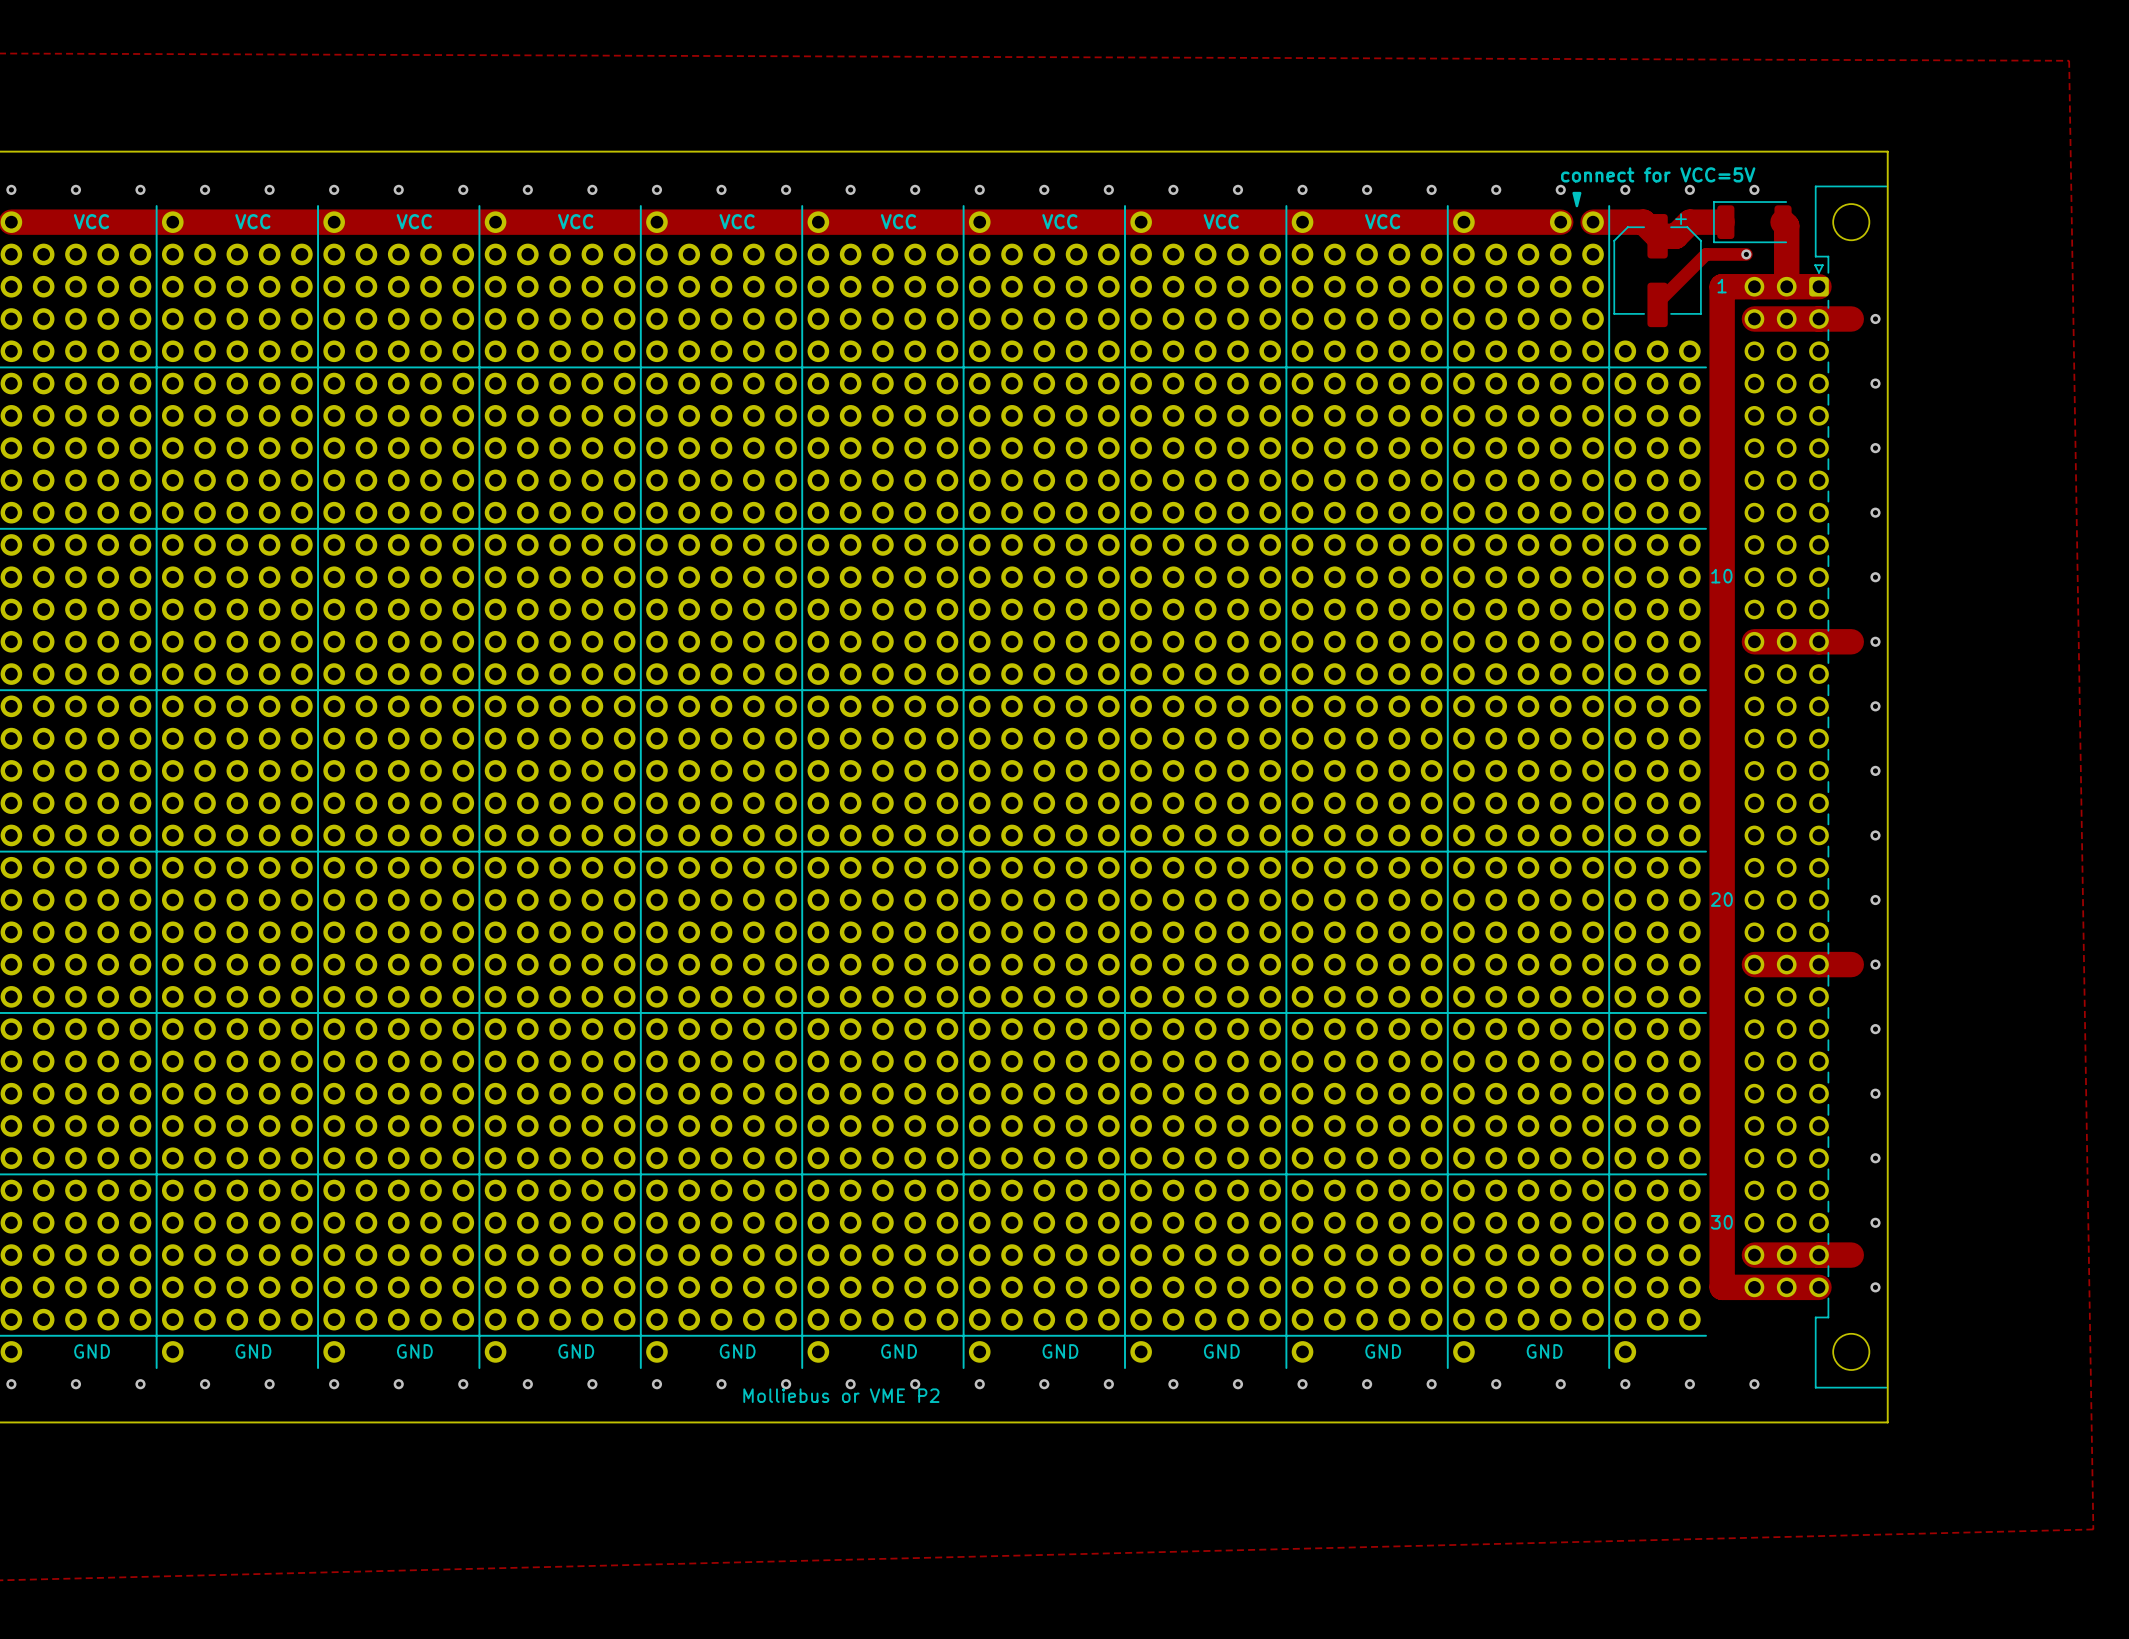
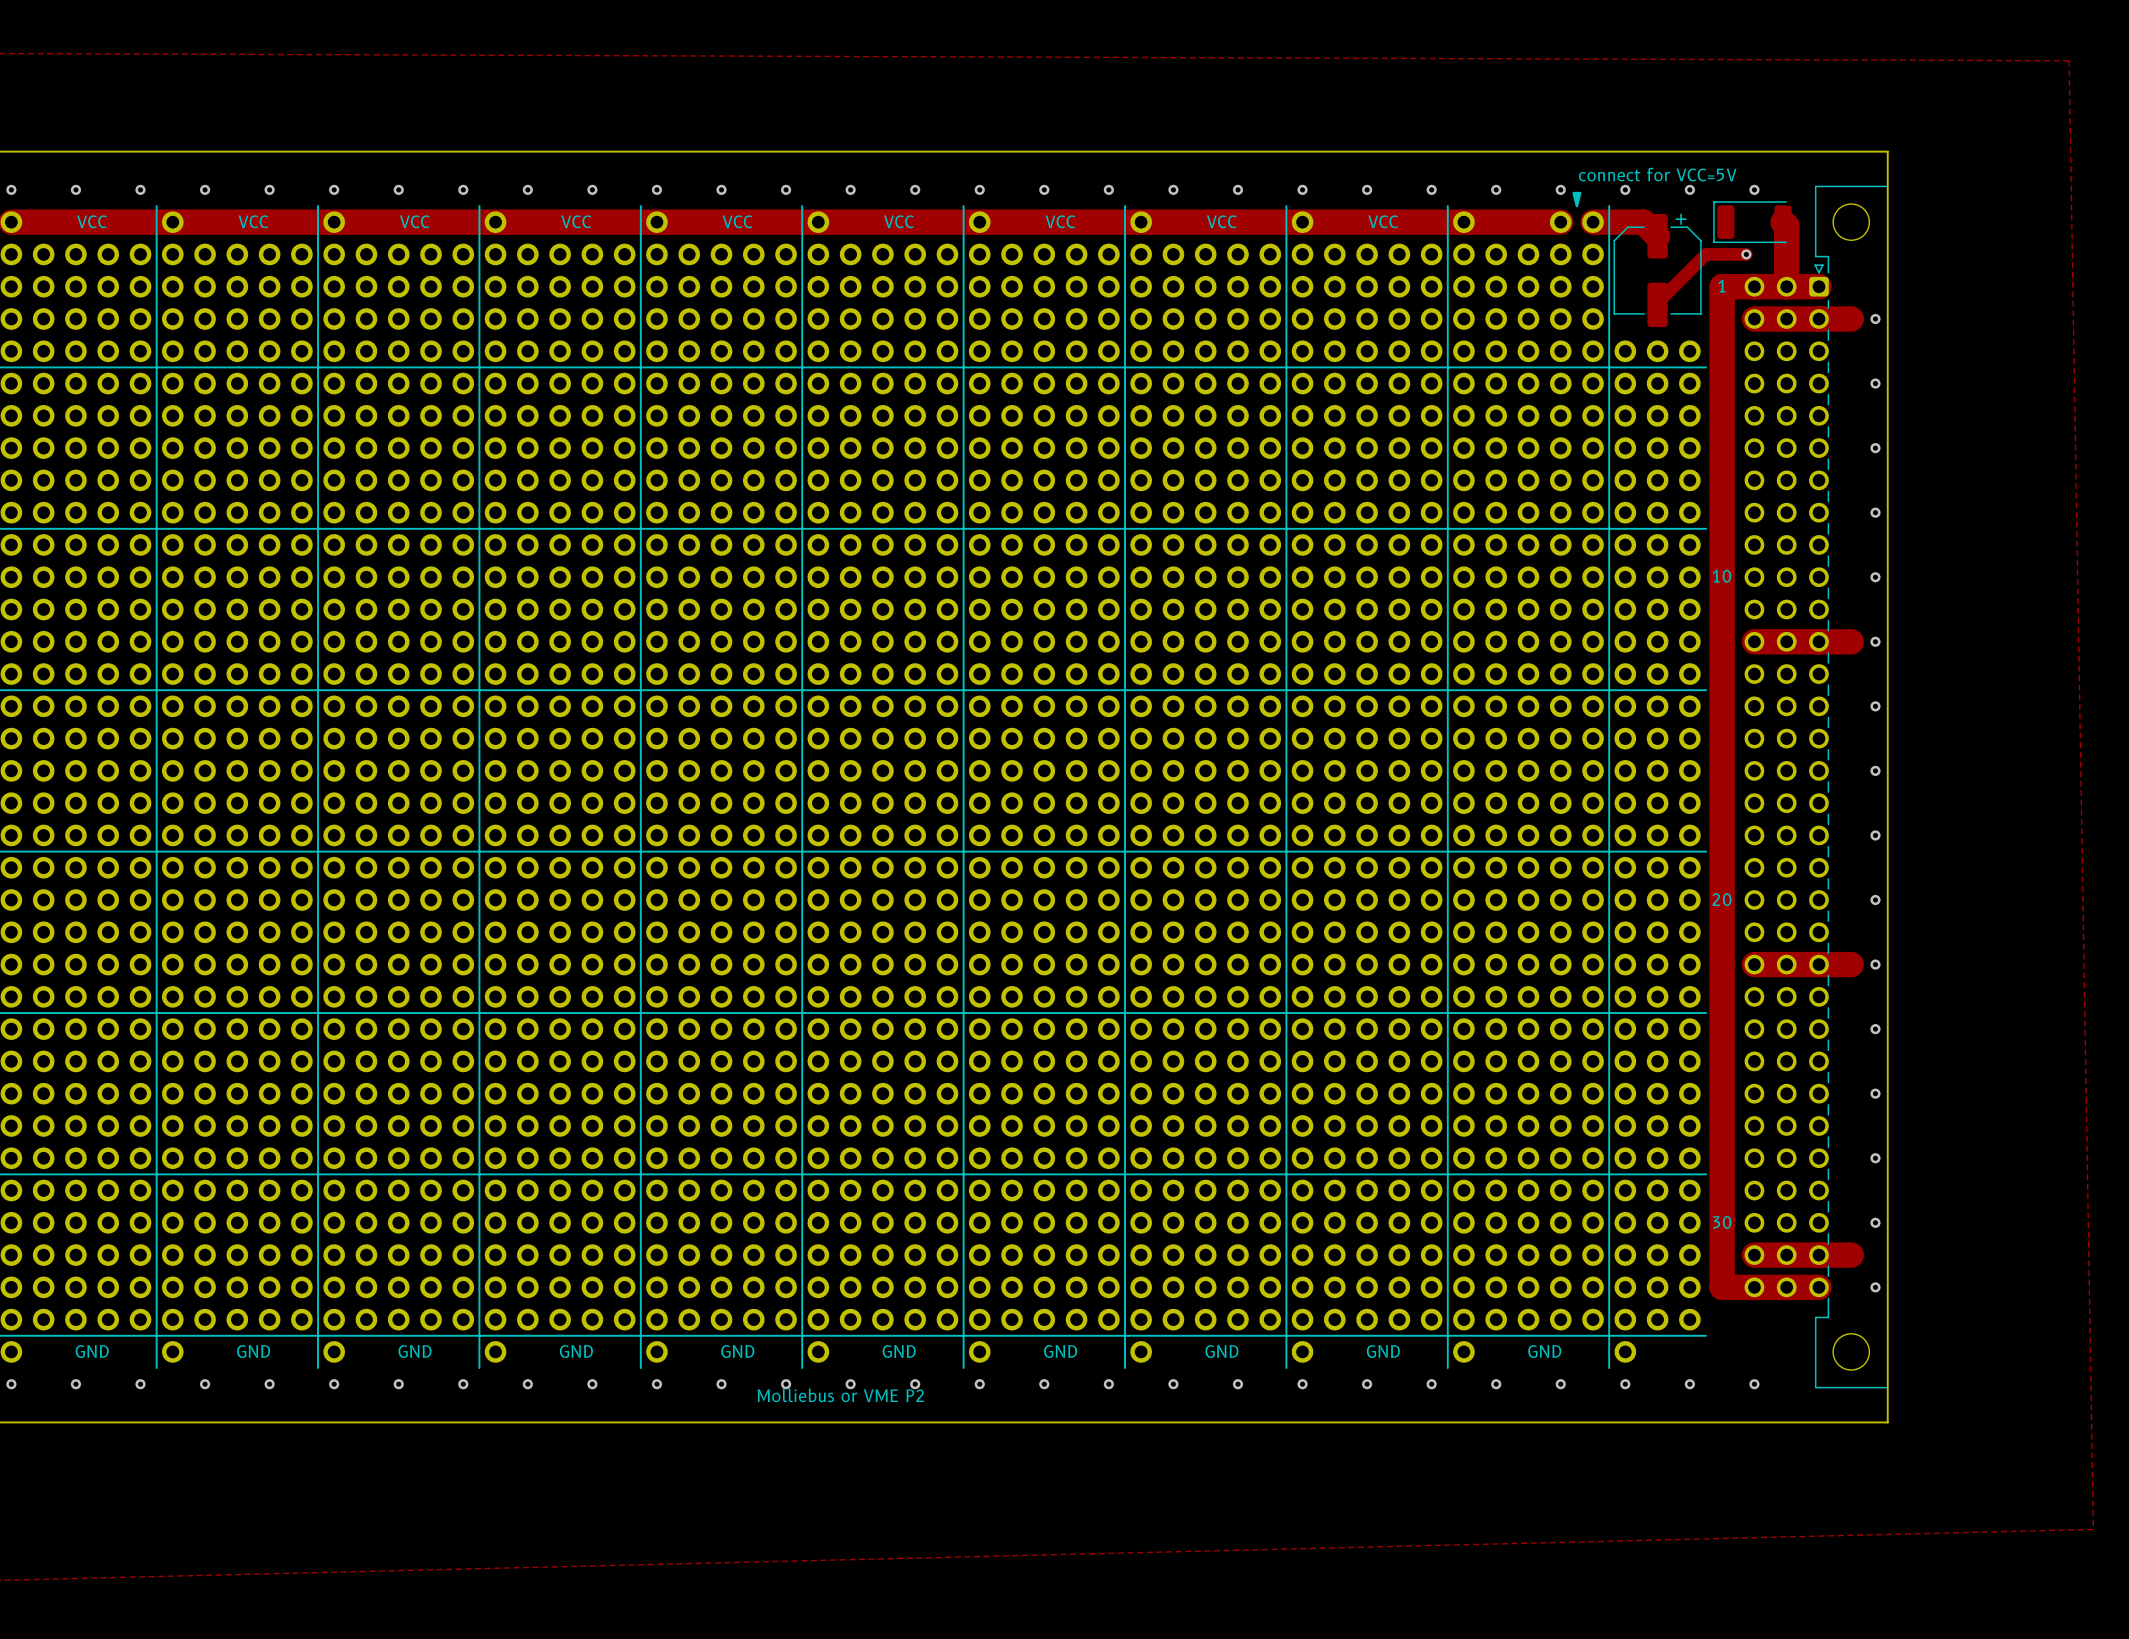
track: (1722, 222) (1689, 222) (1675, 236) (1657, 236) -> none

